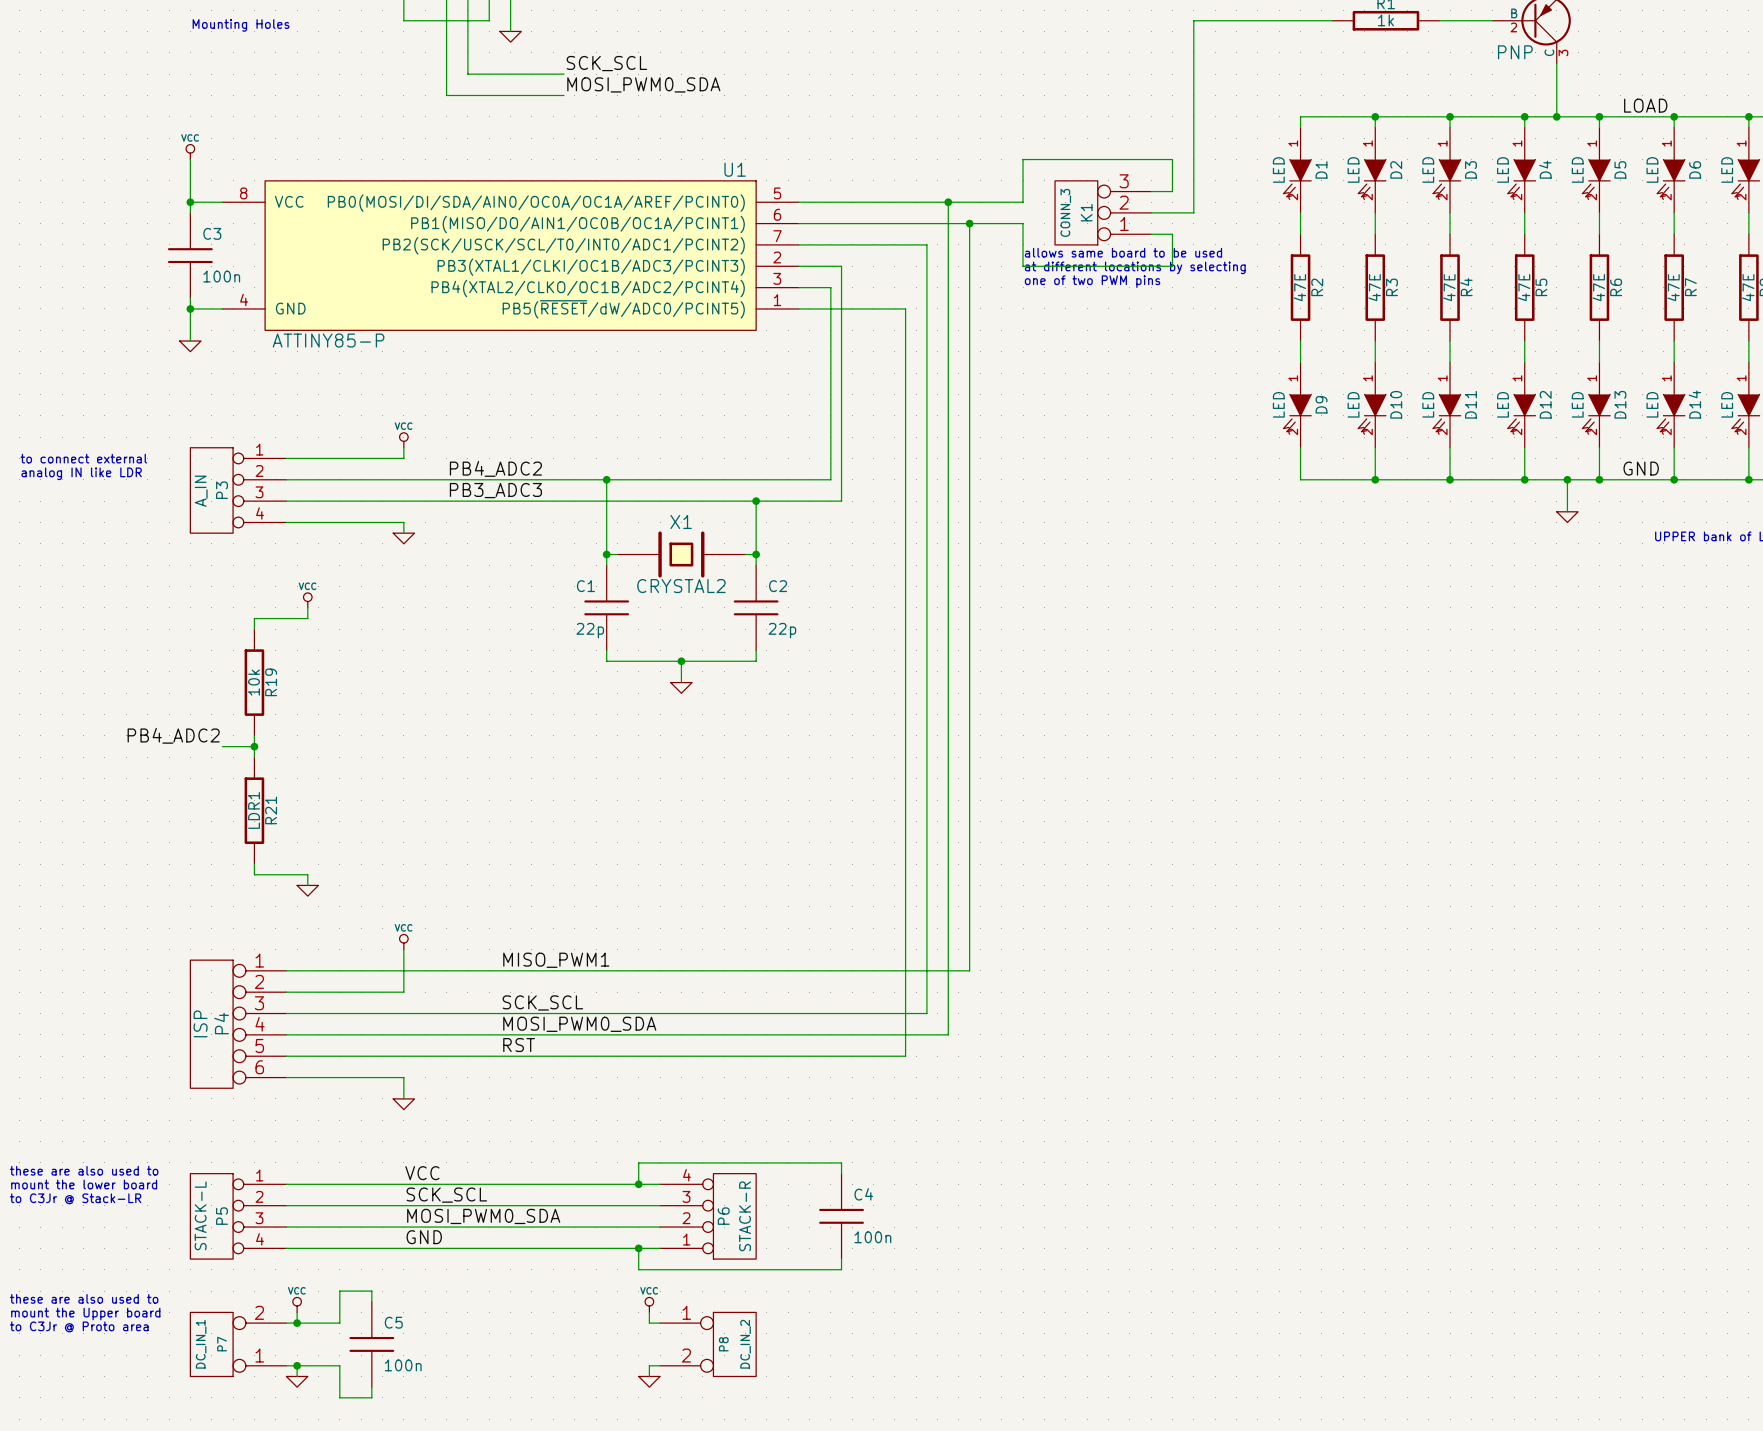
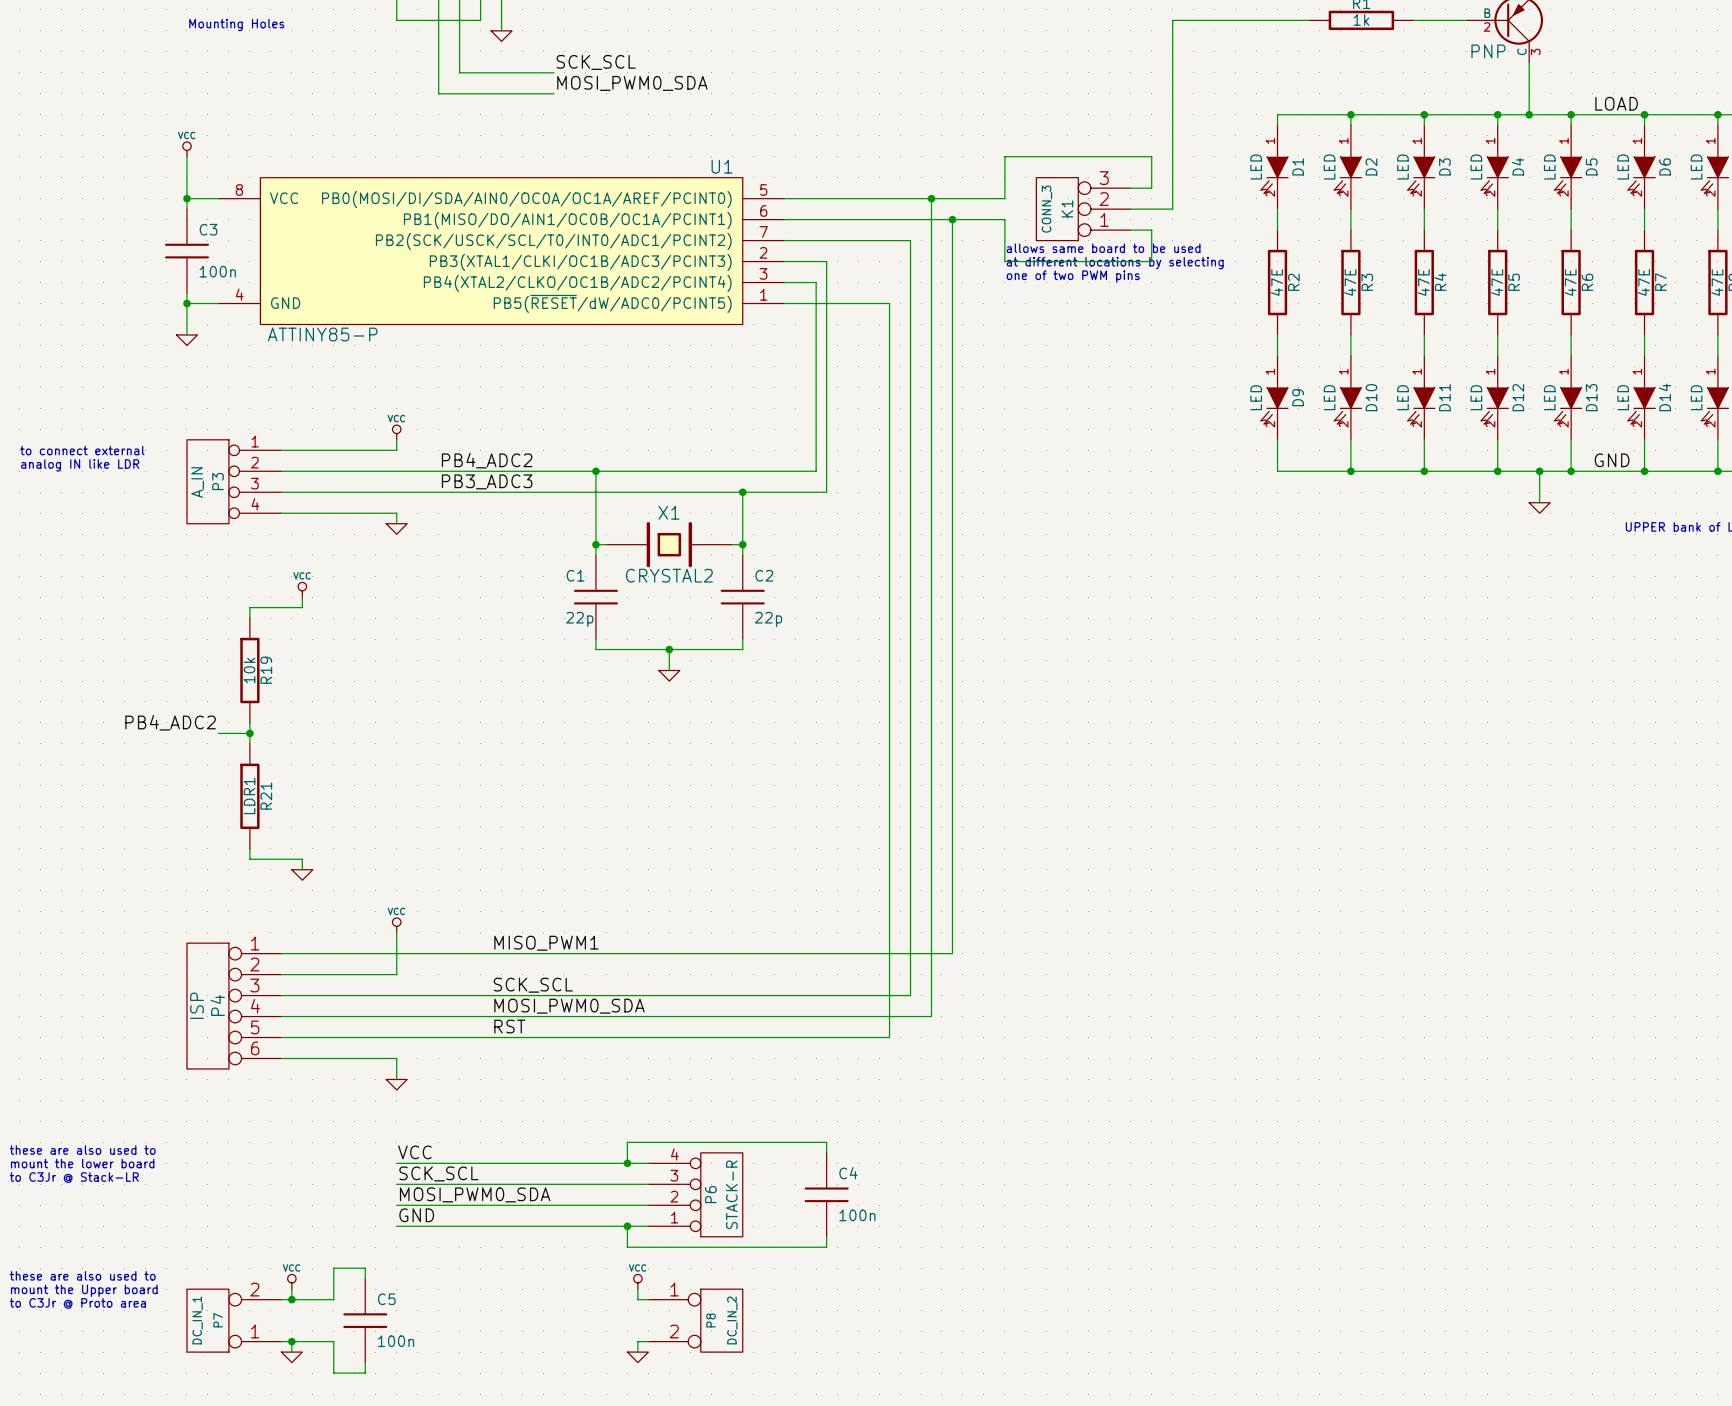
wire: (286, 1184) (403, 1184) -> none
wire: (286, 1205) (403, 1205) -> none
P5: STACK-L (238, 1216) -> none
wire: (286, 1227) (403, 1227) -> none
wire: (286, 1248) (403, 1248) -> none

